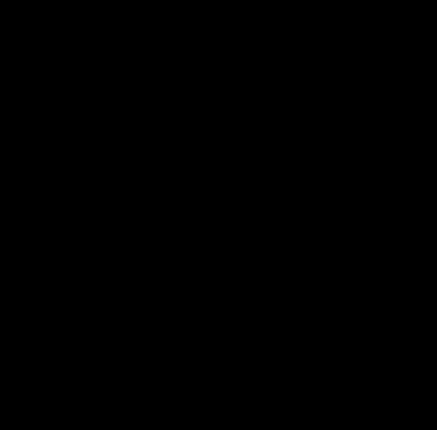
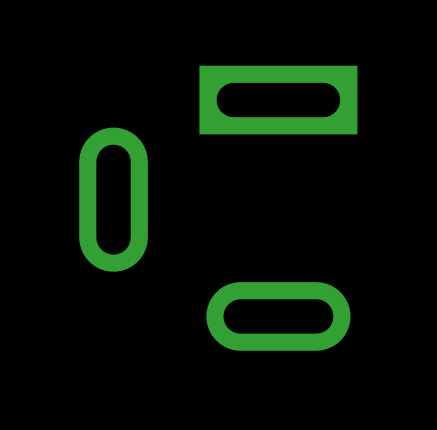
part: none -> (218, 208)

